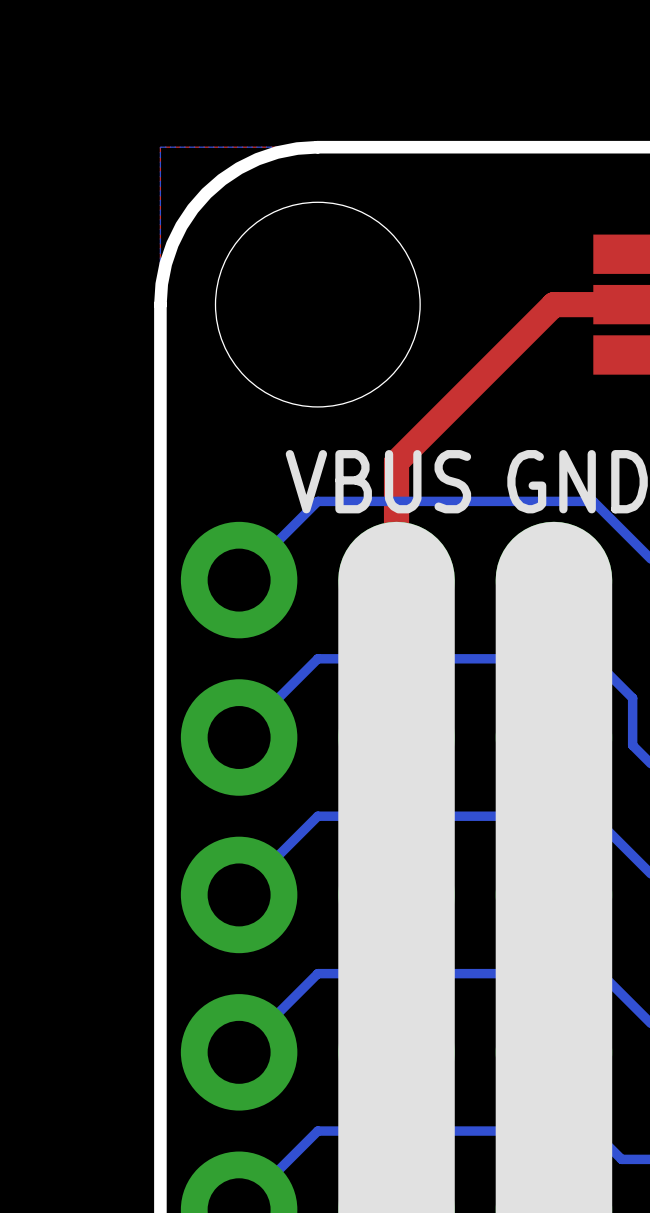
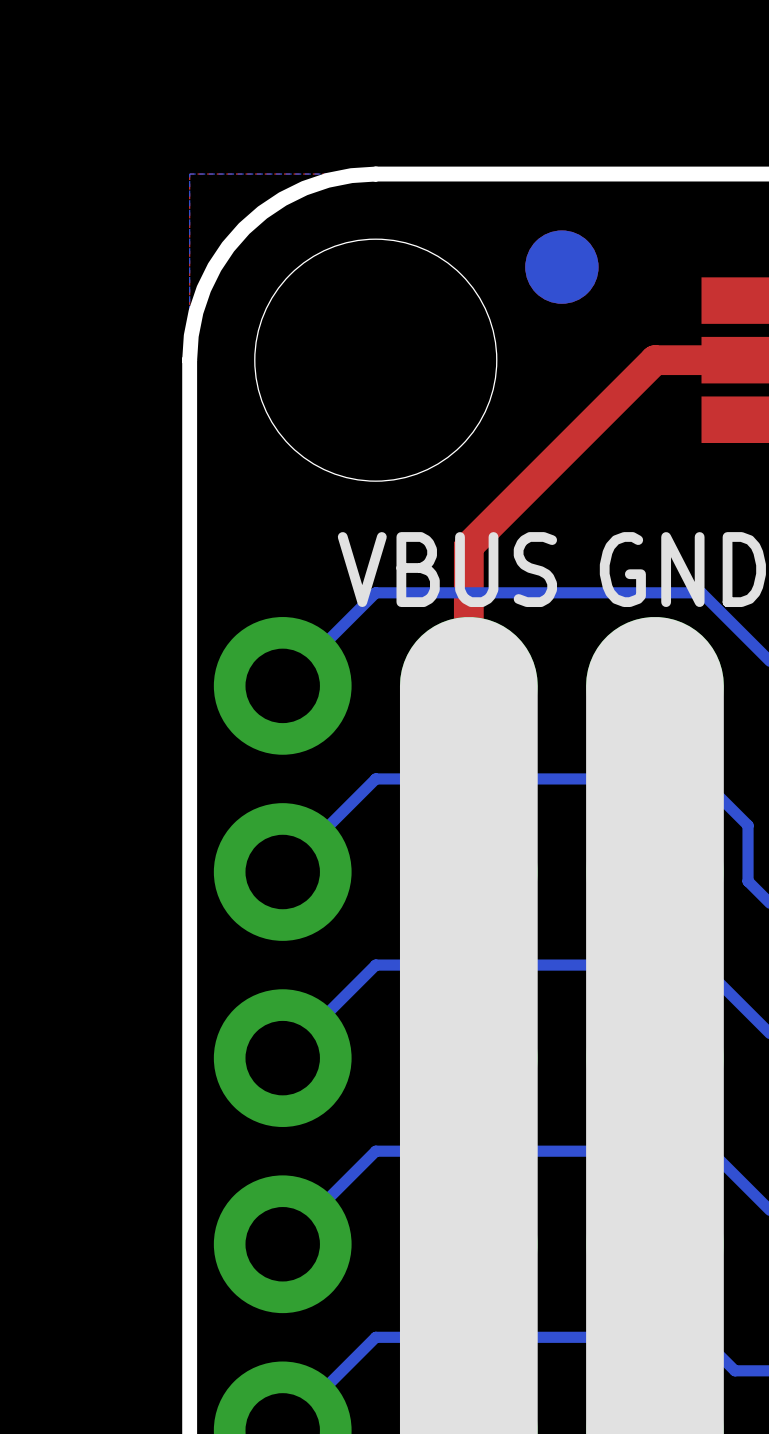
part: none -> (561, 267)

